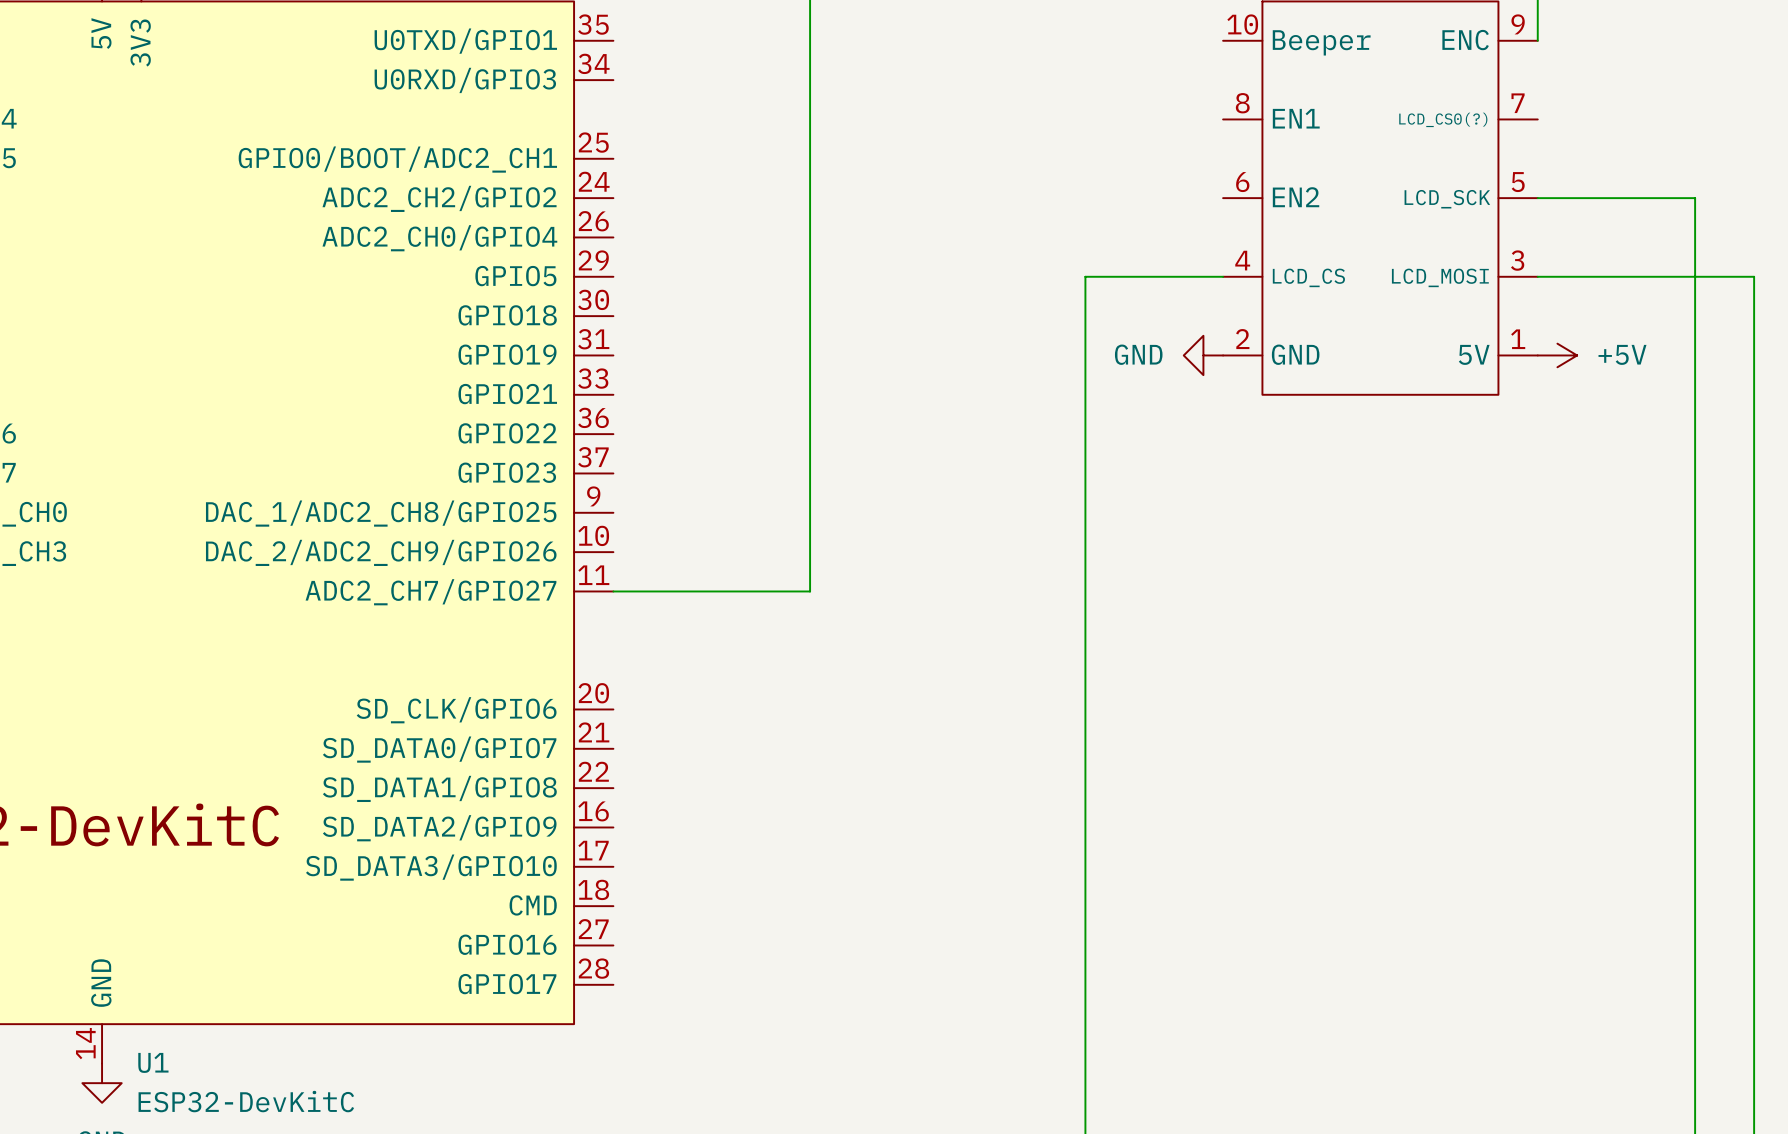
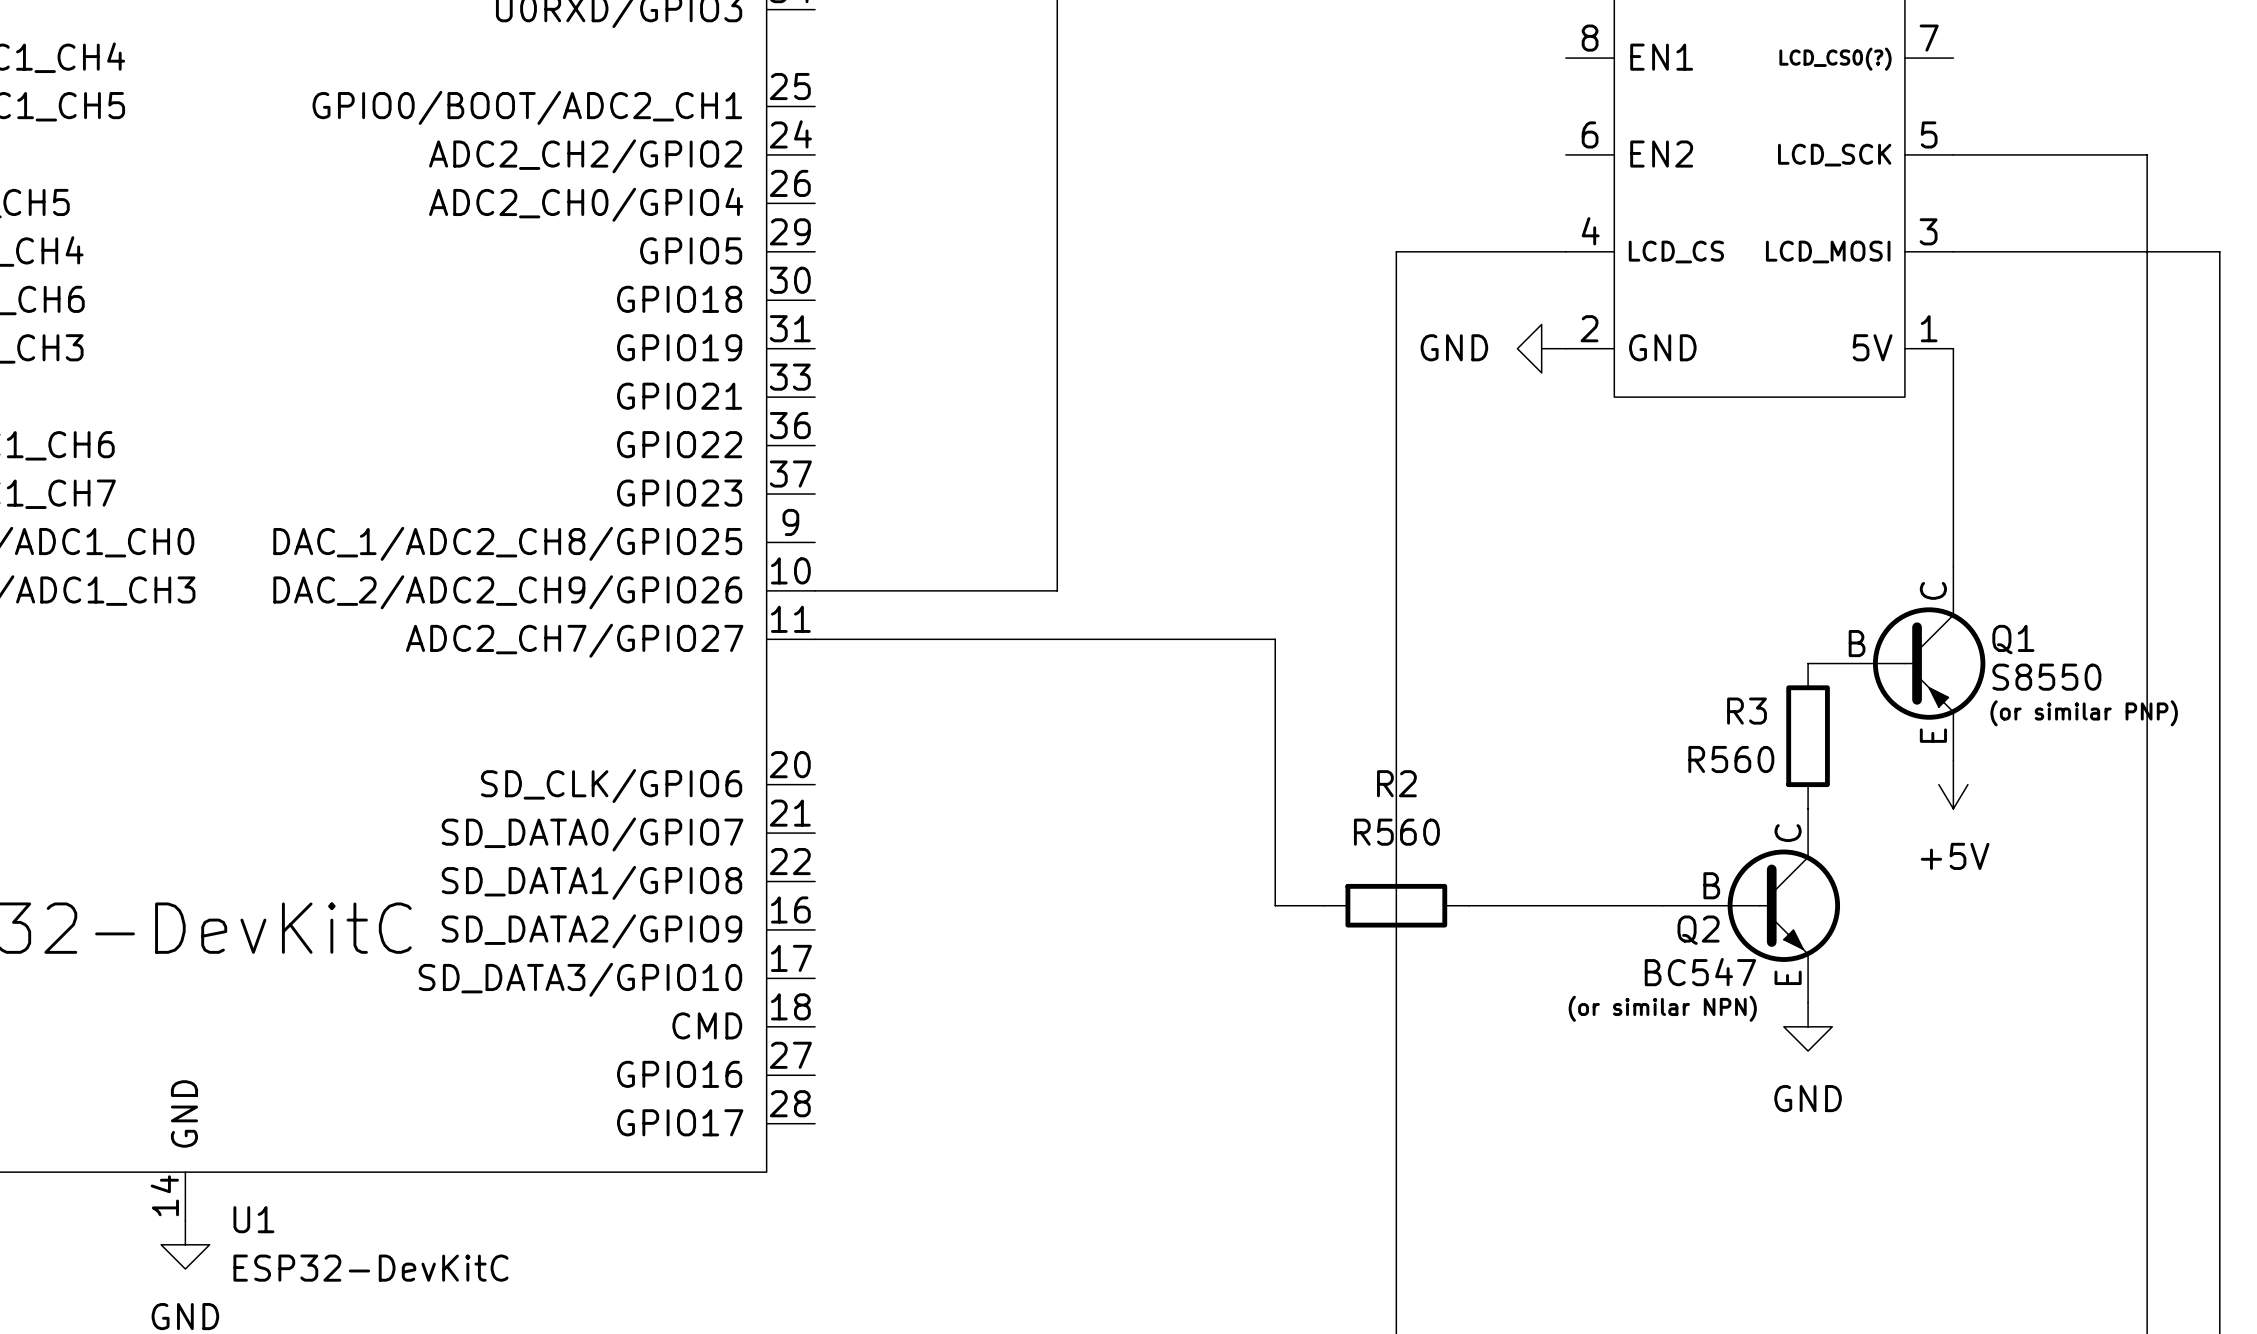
wire: none -> (1953, 348) (1953, 566)
power symbol rotation: 0° (1557, 355) -> 90° clockwise (1953, 784)
power symbol position: +5V (1557, 355) -> +5V (1953, 784)
wire: (810, 552) (810, 591) -> (1057, 590) (815, 590)
wire: none -> (1057, 639) (1275, 639) (1275, 905) (1323, 905)
Q1: none -> S8550 (1896, 663)
text: none -> (or similar PNP) (2084, 713)
R3: none -> R560 (1808, 736)
R2: none -> R560 (1396, 905)
wire: none -> (1468, 905) (1662, 905)
Q2: none -> BC547 (1751, 905)
text: none -> (or similar NPN) (1662, 1008)
power symbol: none -> GND (1808, 1026)

